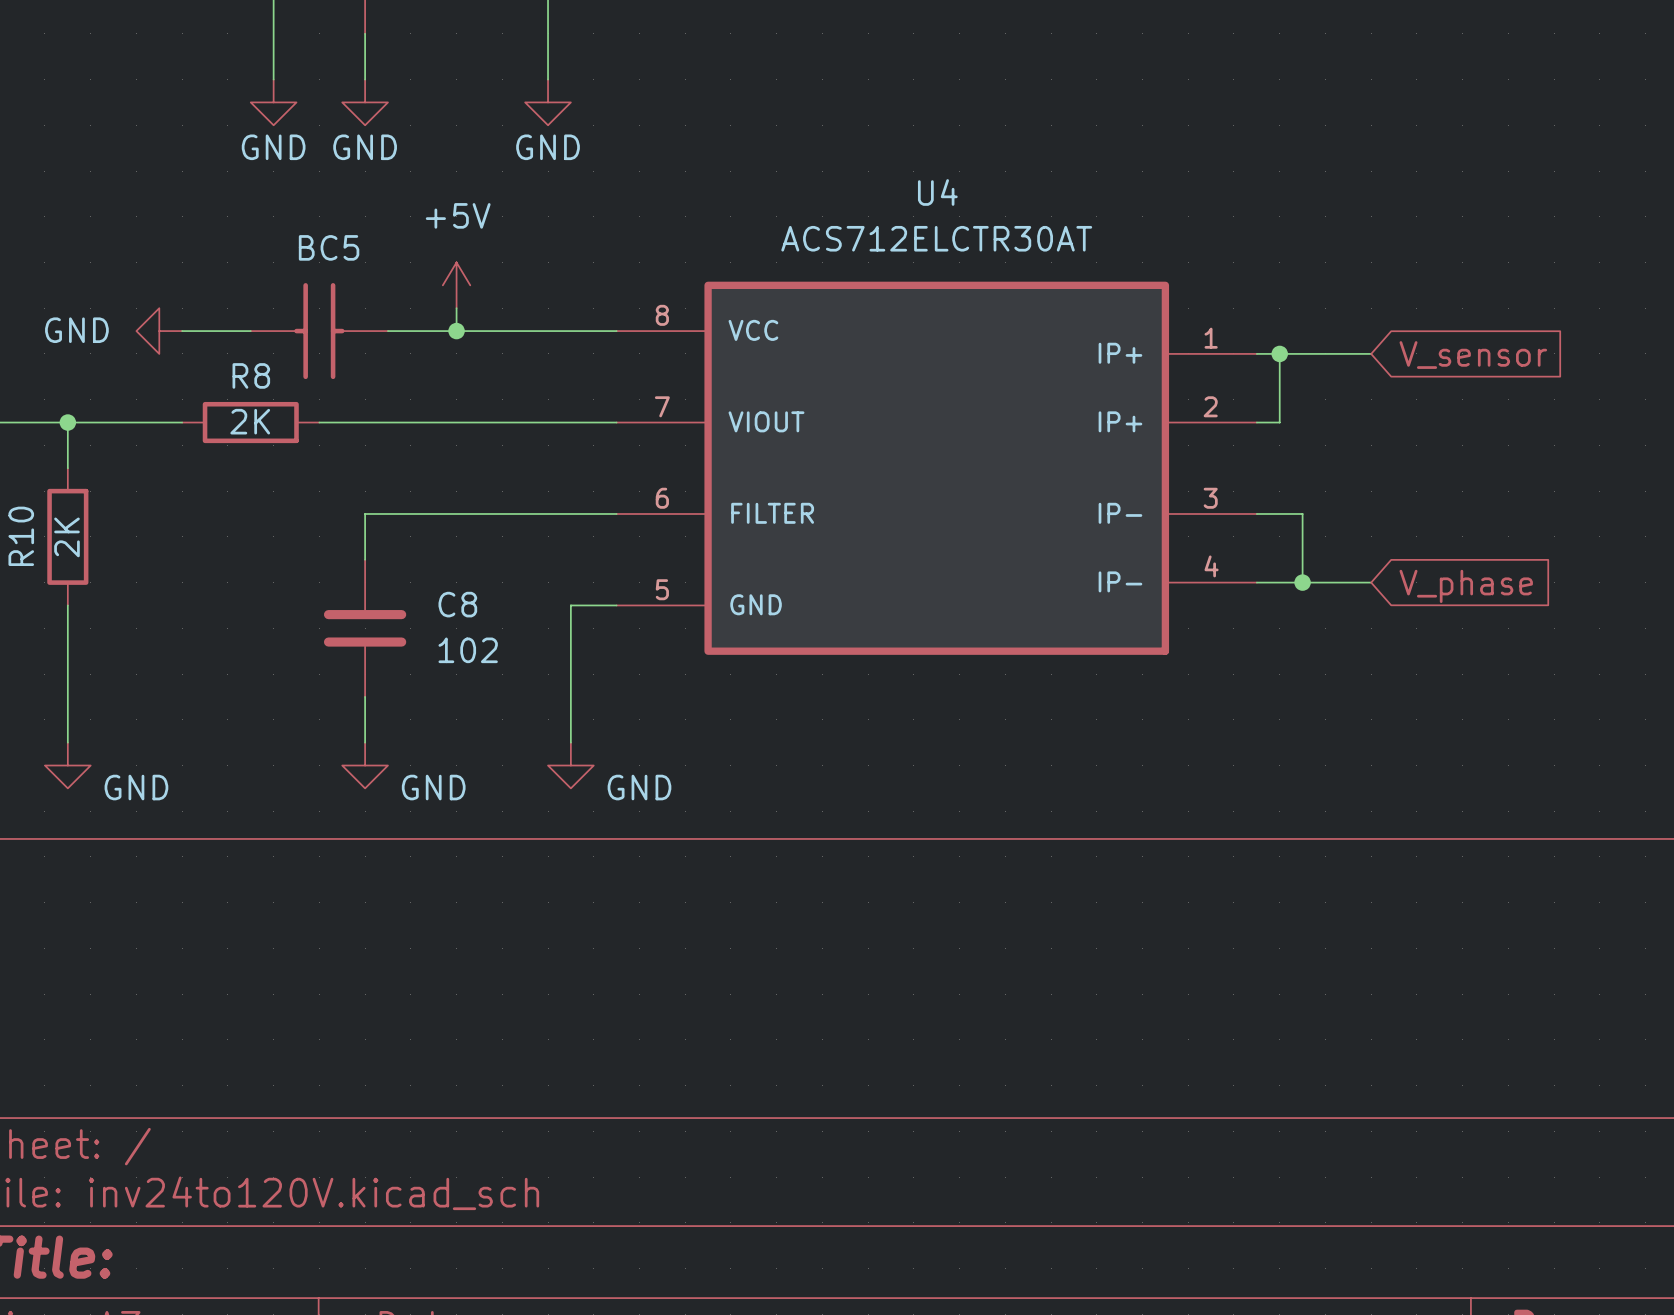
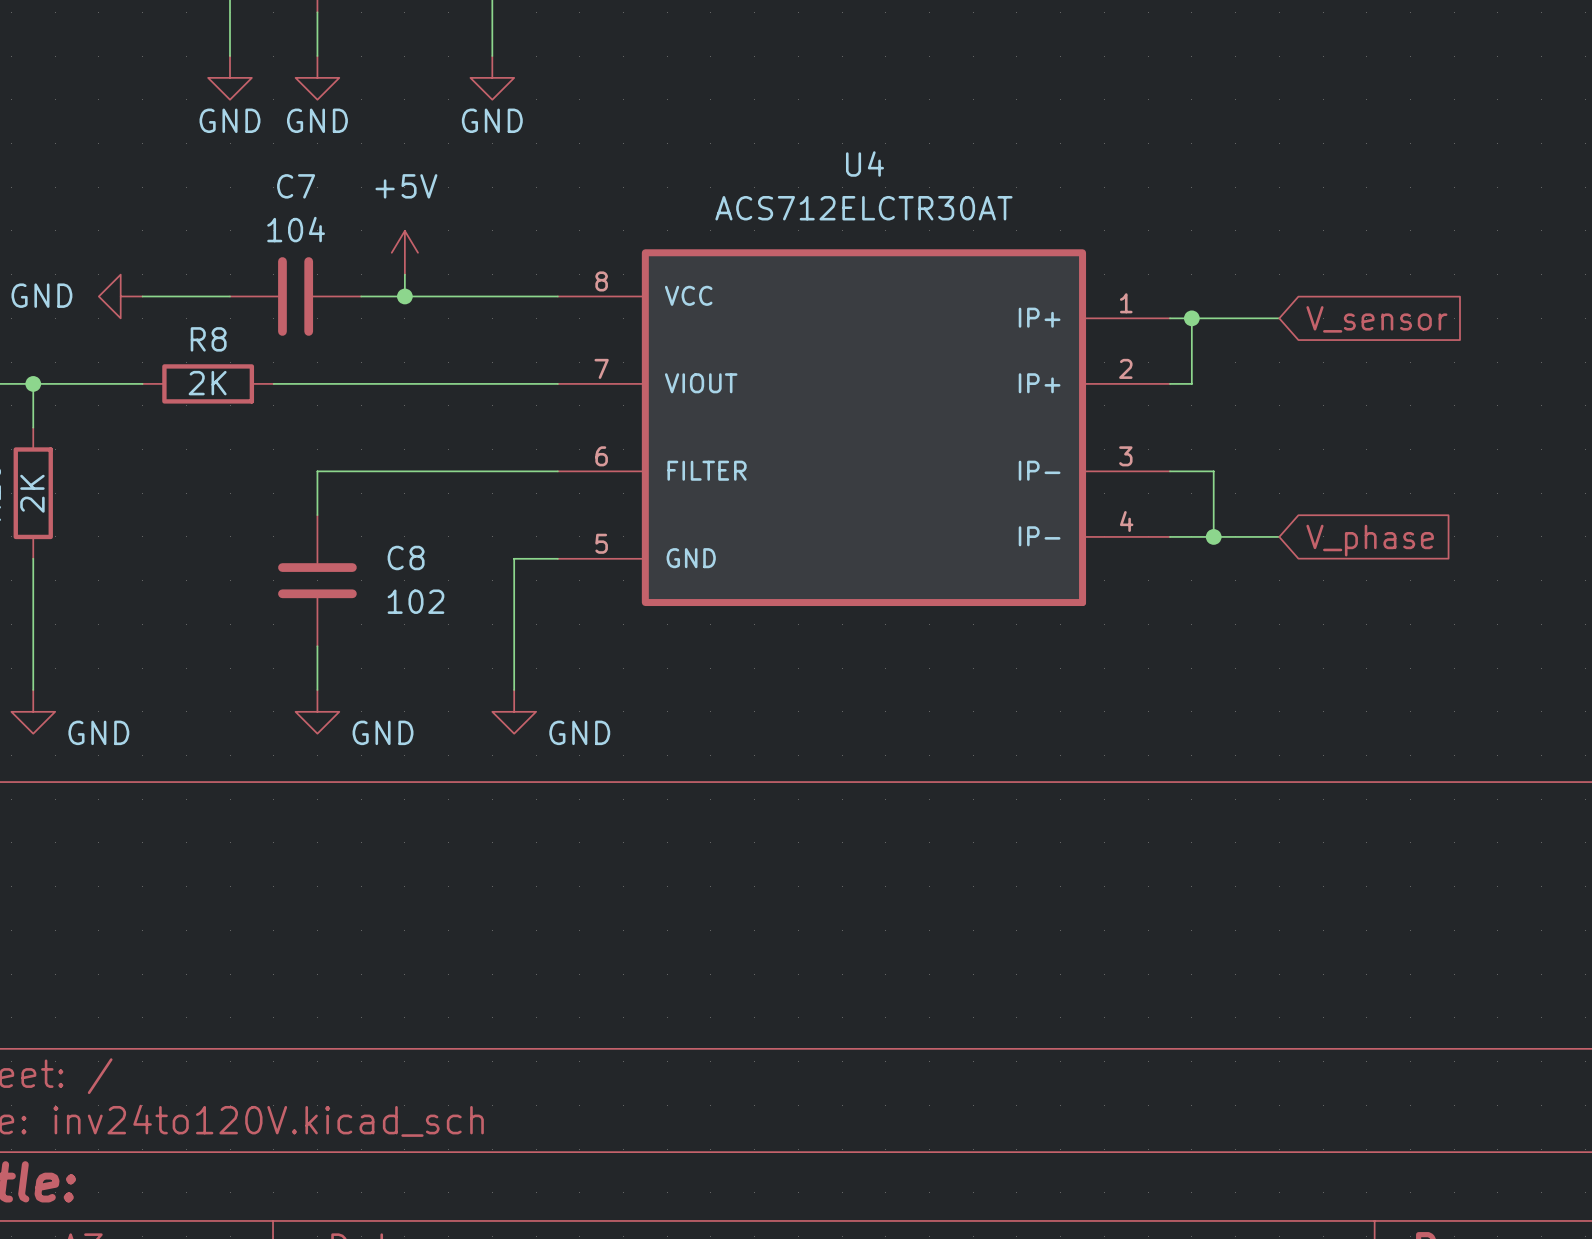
BC5: (319, 331) -> none
C7: none -> 104 (295, 296)

